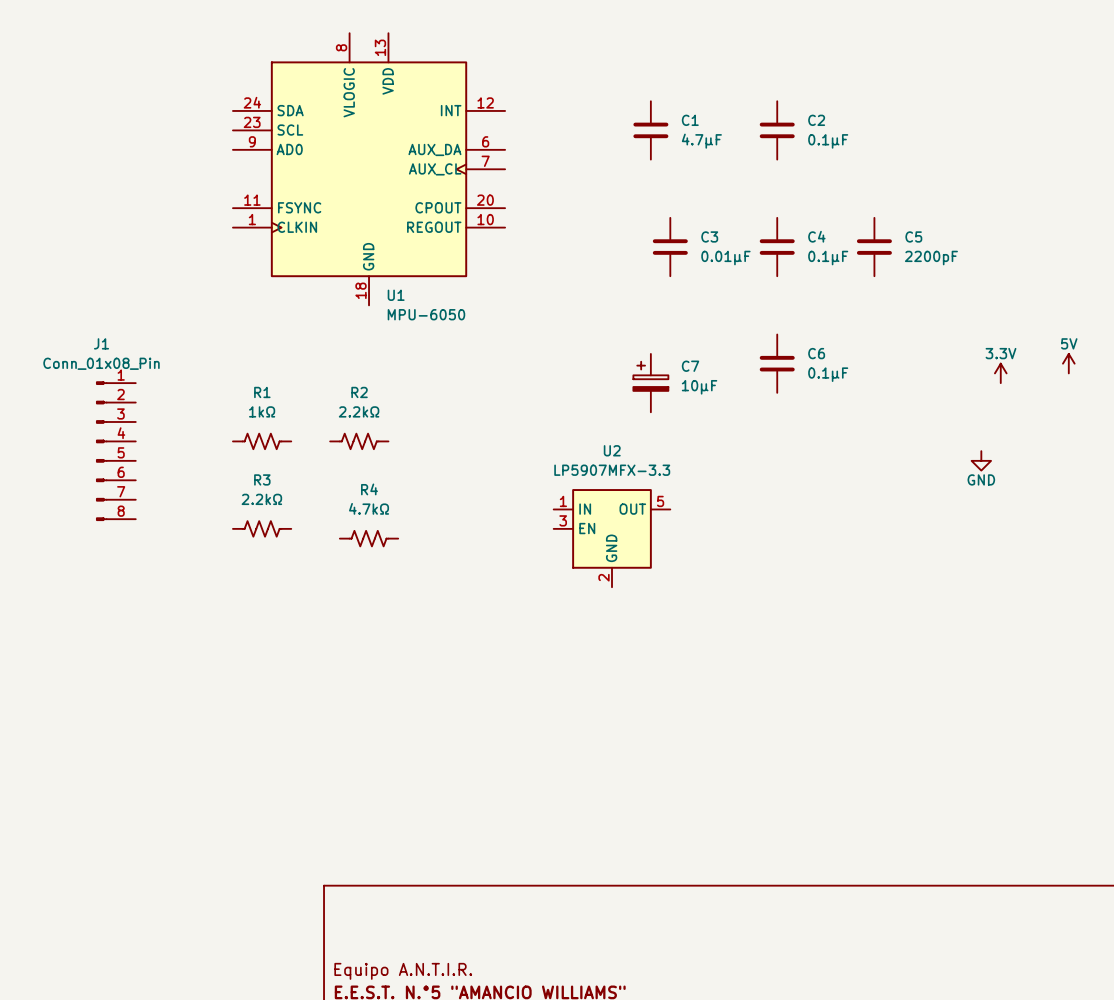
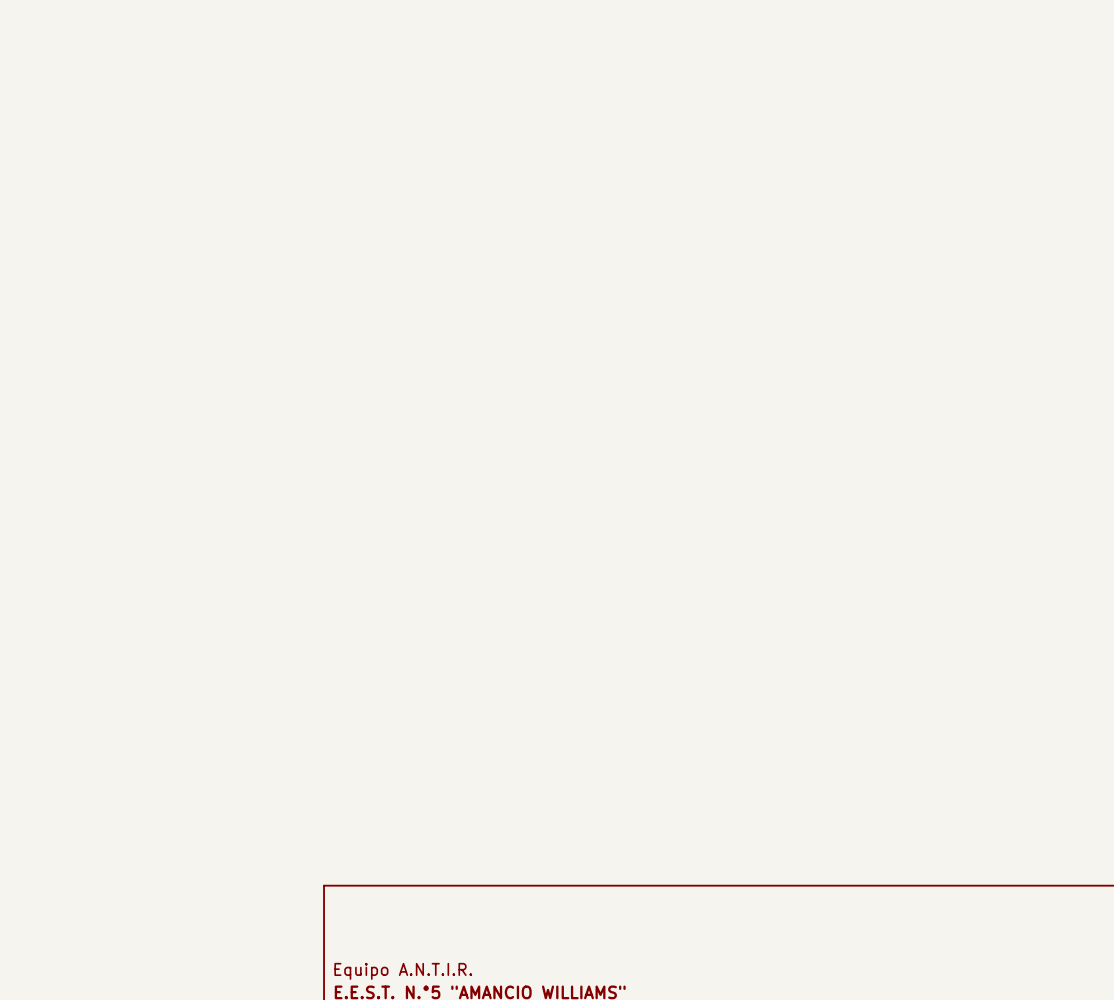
C1: 4.7µF (650, 130) -> none
C2: 0.1µF (777, 130) -> none
U1: MPU-6050 (369, 169) -> none
C3: 0.01µF (670, 247) -> none
C4: 0.1µF (777, 247) -> none
C5: 2200pF (874, 247) -> none
C6: 0.1µF (777, 363) -> none
power symbol: 5V (1068, 363) -> none
power symbol: 3.3V (1000, 373) -> none
C7: 10µF (650, 383) -> none
R1: 1kΩ (262, 441) -> none
R2: 2.2kΩ (359, 441) -> none
J1: Conn_01x08_Pin (116, 451) -> none
power symbol: GND (981, 460) -> none
R3: 2.2kΩ (262, 528) -> none
R4: 4.7kΩ (369, 538) -> none
U2: LP5907MFX-3.3 (612, 538) -> none

